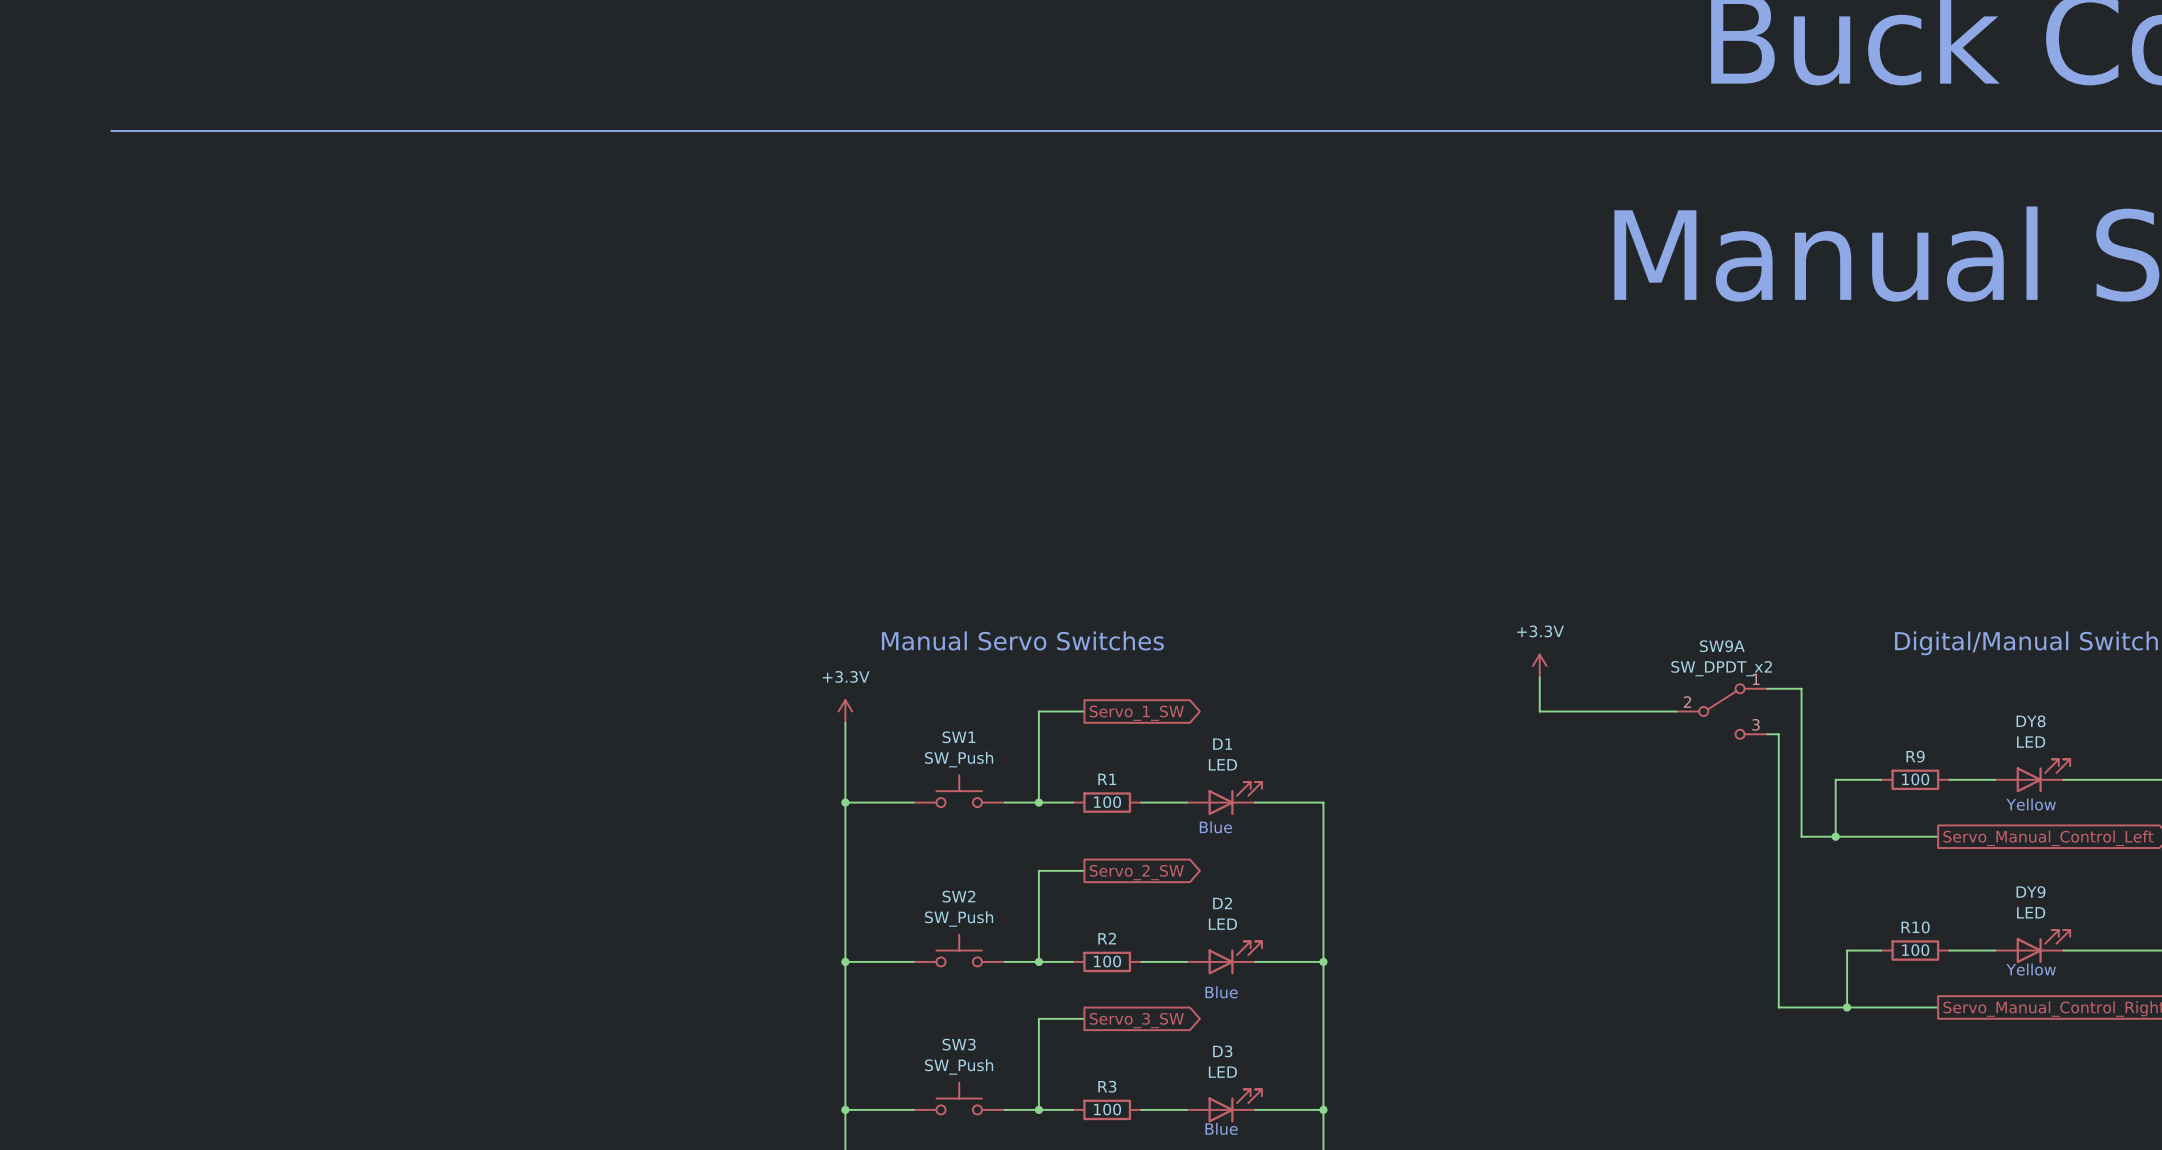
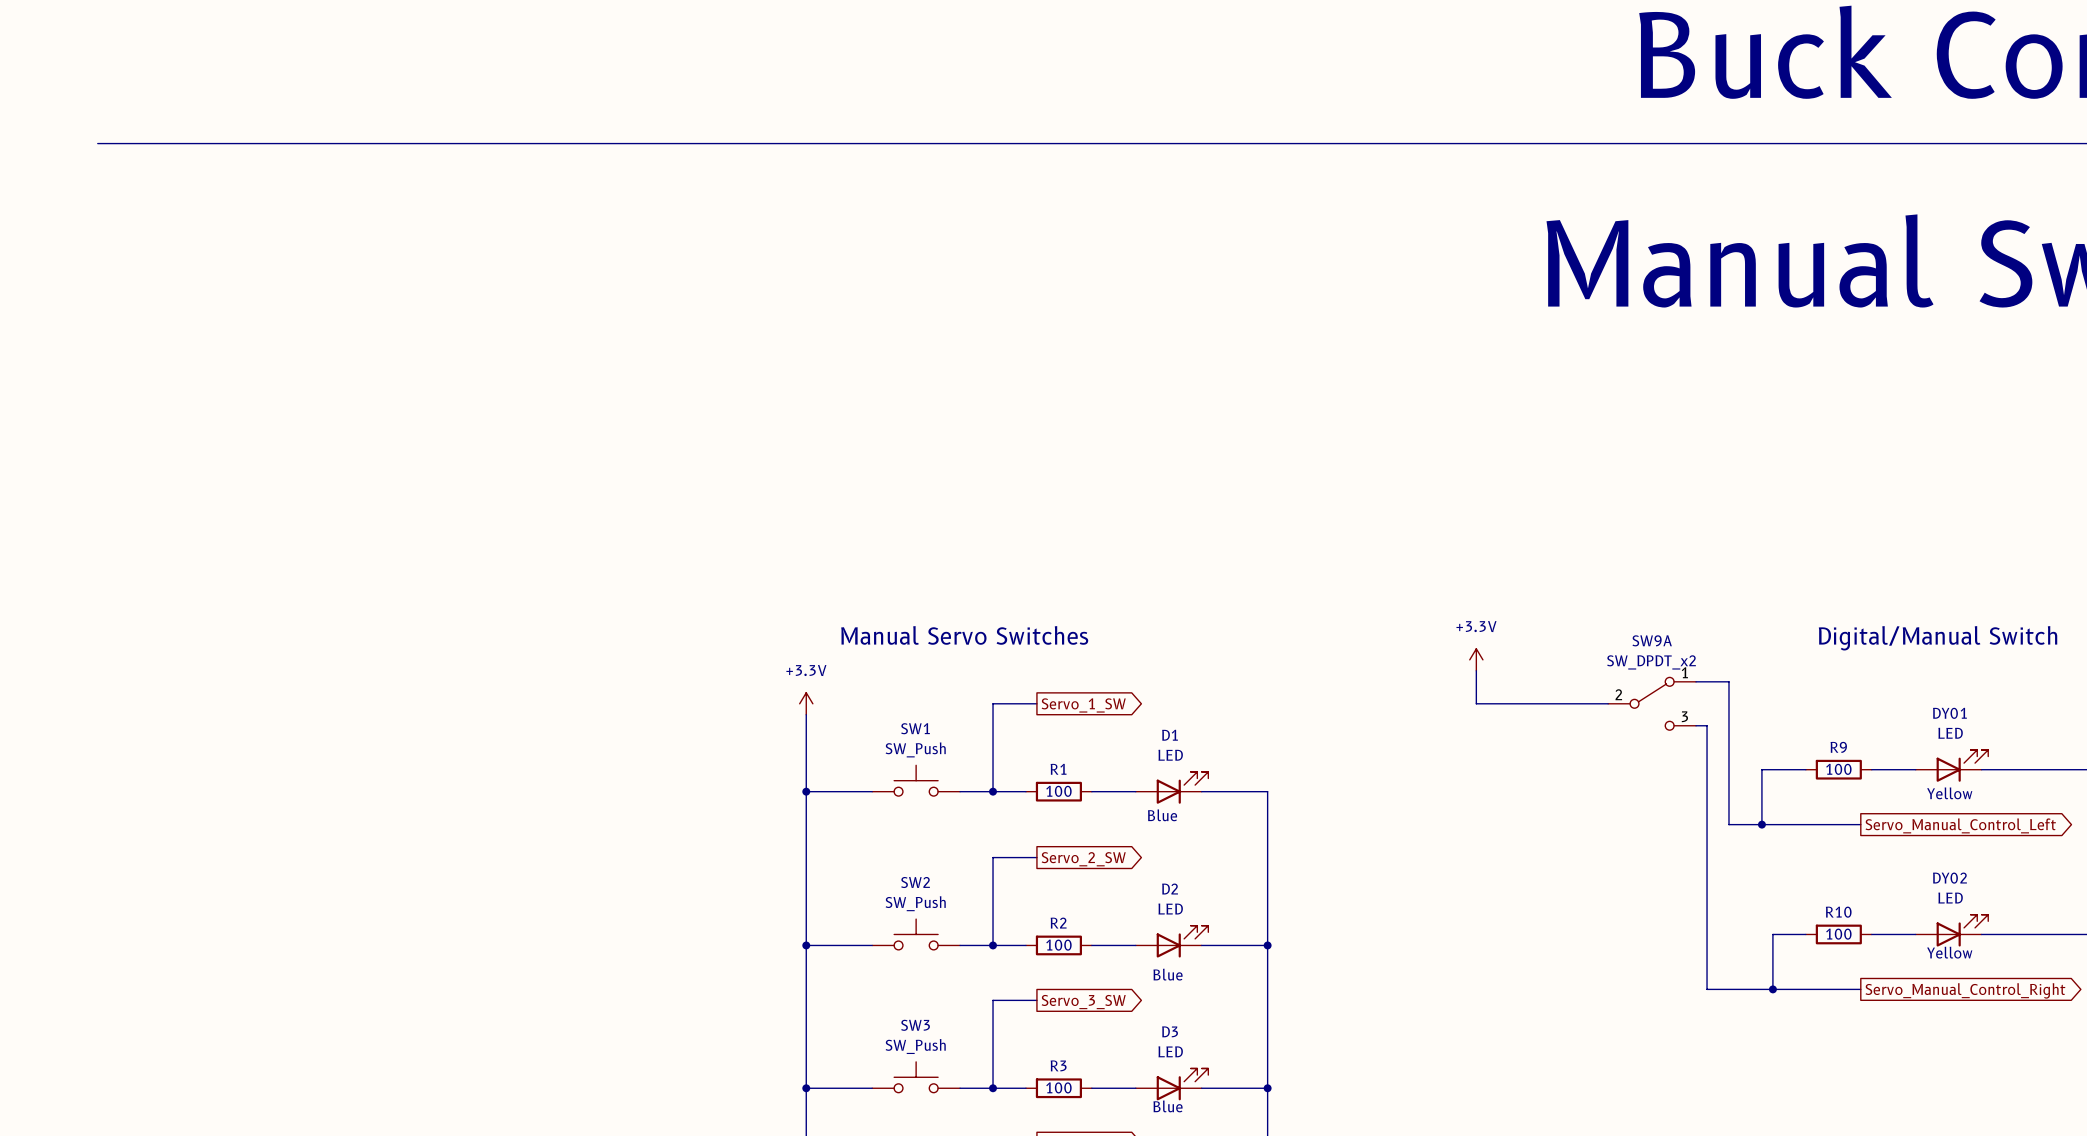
DY8 name: DY8 (2031, 721) -> DY01 (1949, 713)
DY9 name: DY9 (2031, 892) -> DY02 (1949, 878)

